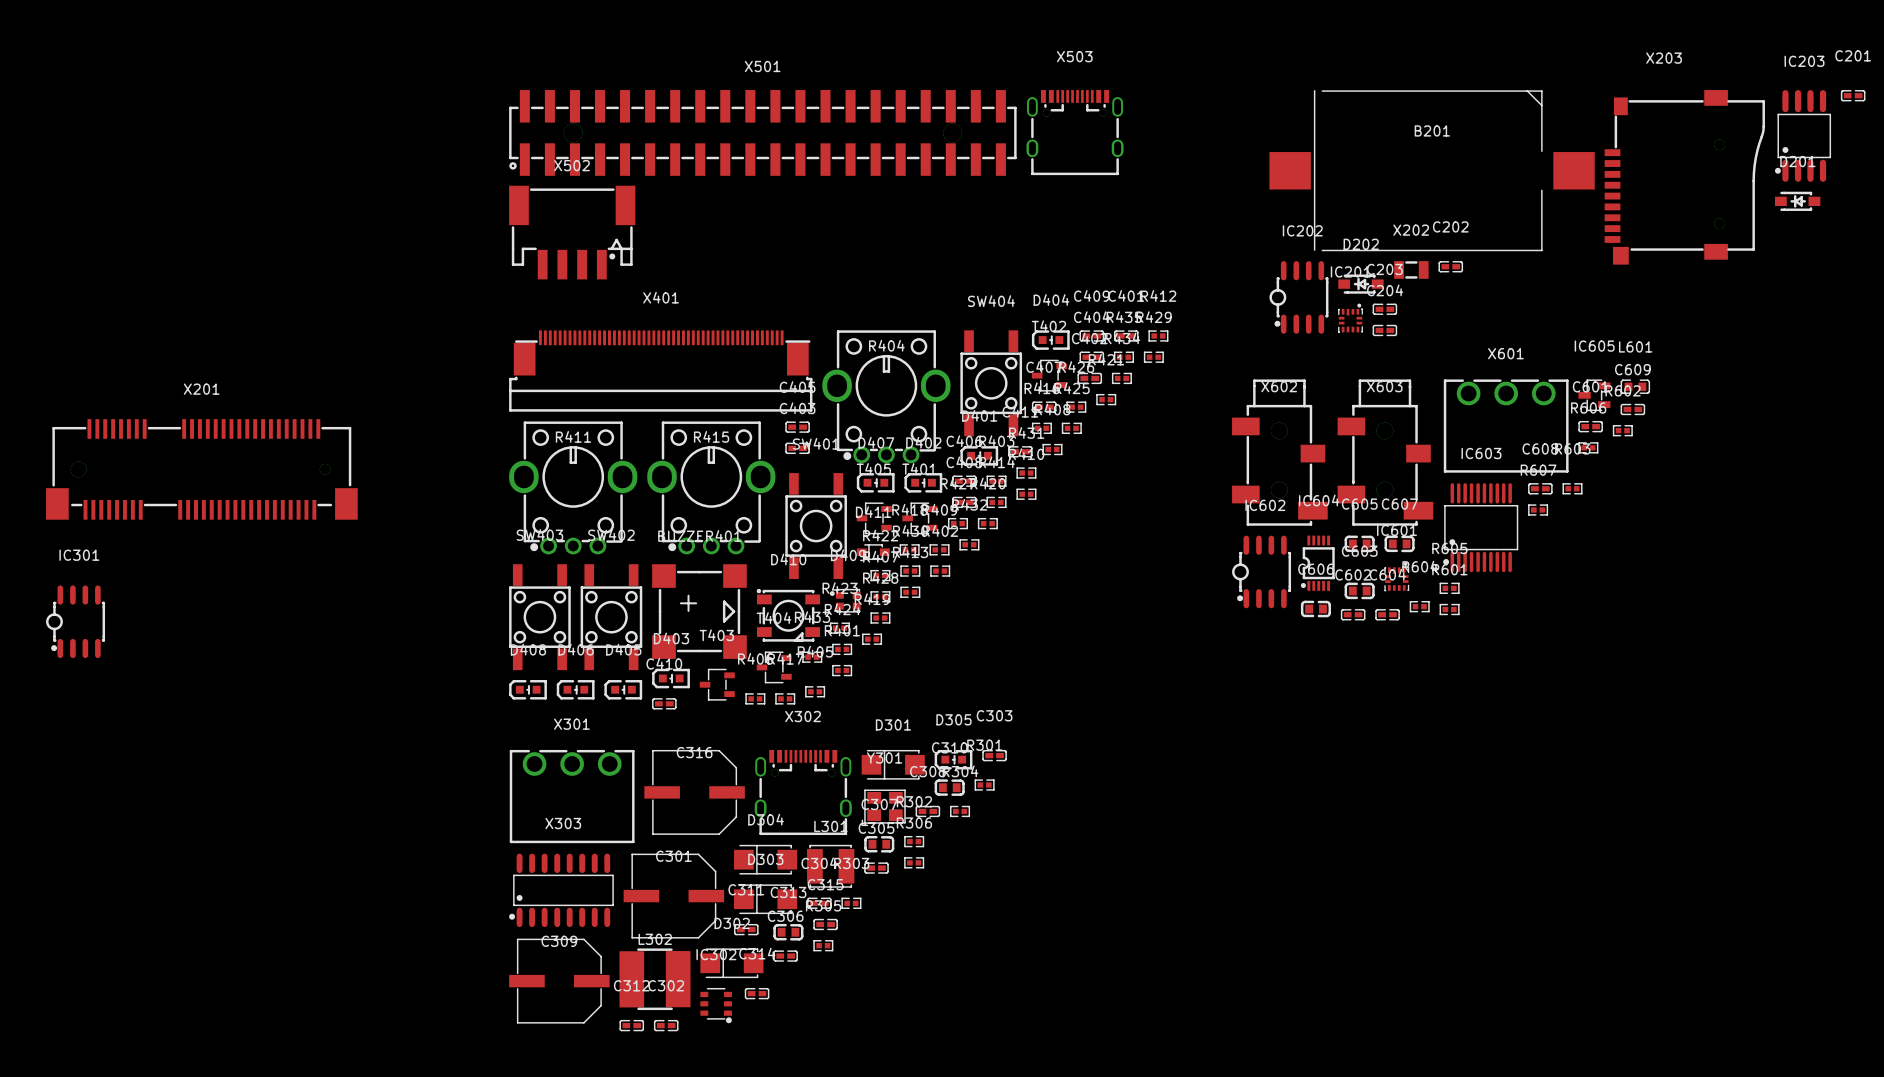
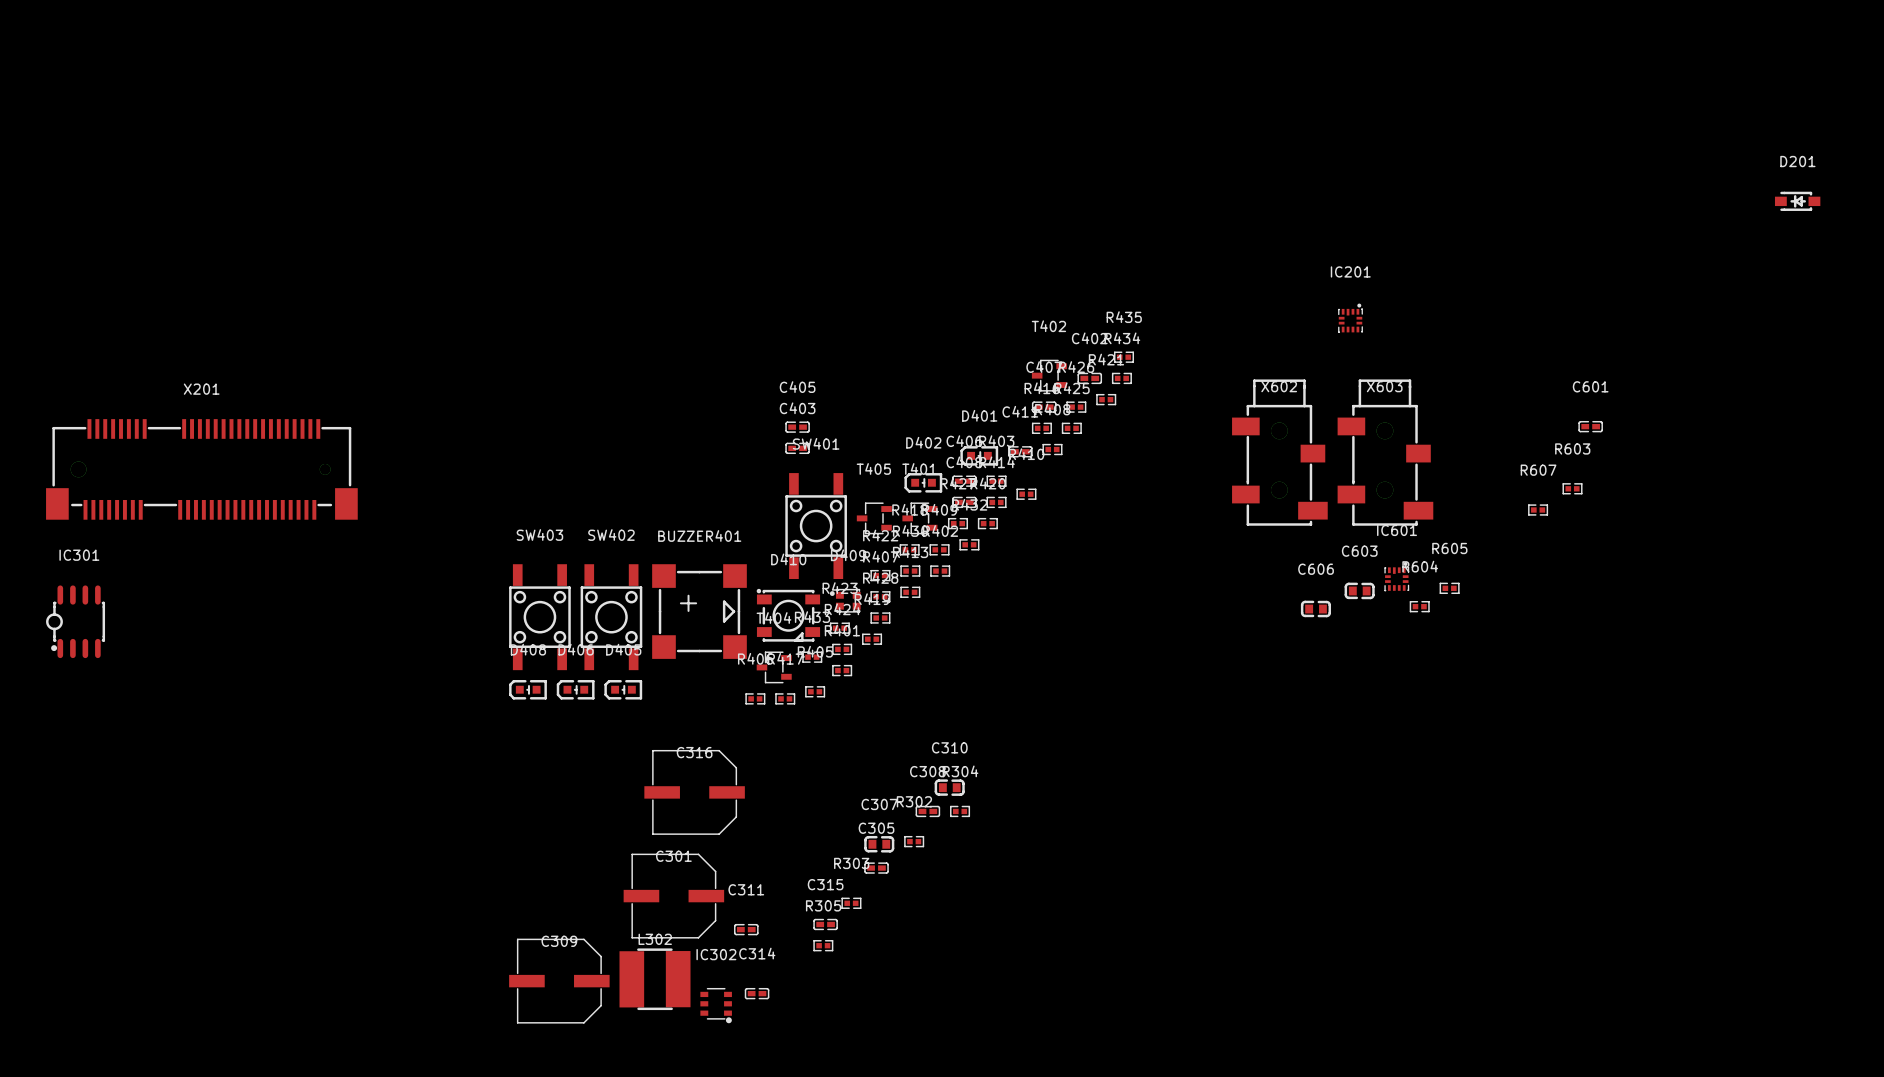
C201: (1853, 95) -> none
X501: (762, 132) -> none
X503: (1075, 132) -> none
IC203: (1803, 135) -> none
B201: (1432, 170) -> none
X203: (1684, 177) -> none
X502: (572, 232) -> none
C202: (1450, 266) -> none
X202: (1411, 269) -> none
D202: (1360, 284) -> none
IC202: (1298, 297) -> none
C203: (1384, 309) -> none
C204: (1384, 330) -> none
C409: (1091, 336) -> none
C401: (1126, 336) -> none
R412: (1158, 336) -> none
D404: (1050, 340) -> none
C404: (1091, 357) -> none
R429: (1153, 357) -> none
X401: (660, 370) -> none
SW404: (991, 383) -> none
L601: (1635, 386) -> none
IC605: (1594, 395) -> none
R404: (886, 396) -> none
C609: (1632, 409) -> none
X601: (1506, 426) -> none
R602: (1622, 430) -> none
R606: (1588, 447) -> none
R431: (1026, 473) -> none
D407: (875, 482) -> none
R411: (573, 487) -> none
R415: (711, 487) -> none
C608: (1540, 488) -> none
IC603: (1480, 527) -> none
C605: (1359, 543) -> none
C607: (1399, 543) -> none
D411: (873, 552) -> none
IC604: (1317, 563) -> none
IC602: (1261, 571) -> none
R601: (1449, 609) -> none
C602: (1353, 614) -> none
C604: (1387, 614) -> none
D403: (671, 678) -> none
T403: (717, 684) -> none
C410: (664, 703) -> none
C303: (994, 755) -> none
D305: (953, 759) -> none
D301: (893, 764) -> none
R301: (984, 785) -> none
X302: (803, 792) -> none
X301: (572, 796) -> none
Y301: (883, 807) -> none
D304: (765, 859) -> none
R306: (914, 862) -> none
L301: (830, 866) -> none
X303: (561, 890) -> none
D303: (765, 899) -> none
C304: (819, 903) -> none
C313: (788, 932) -> none
C306: (785, 956) -> none
D302: (731, 963) -> none
C312: (631, 1025) -> none
C302: (666, 1025) -> none

